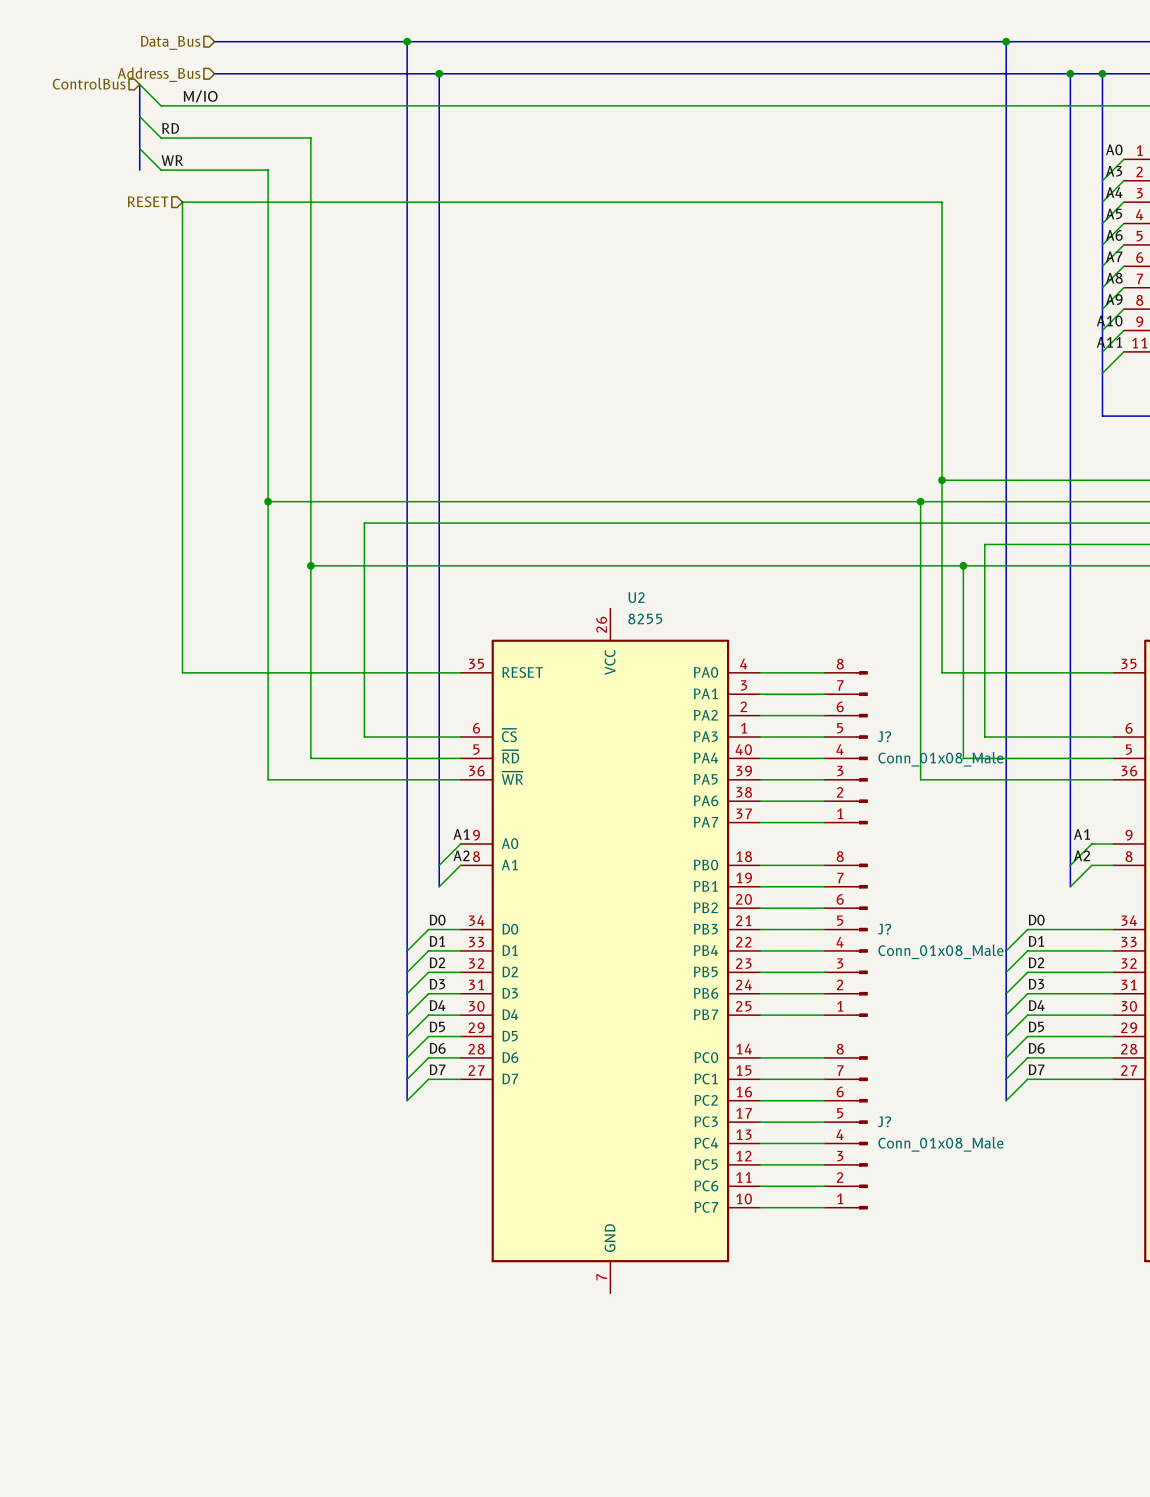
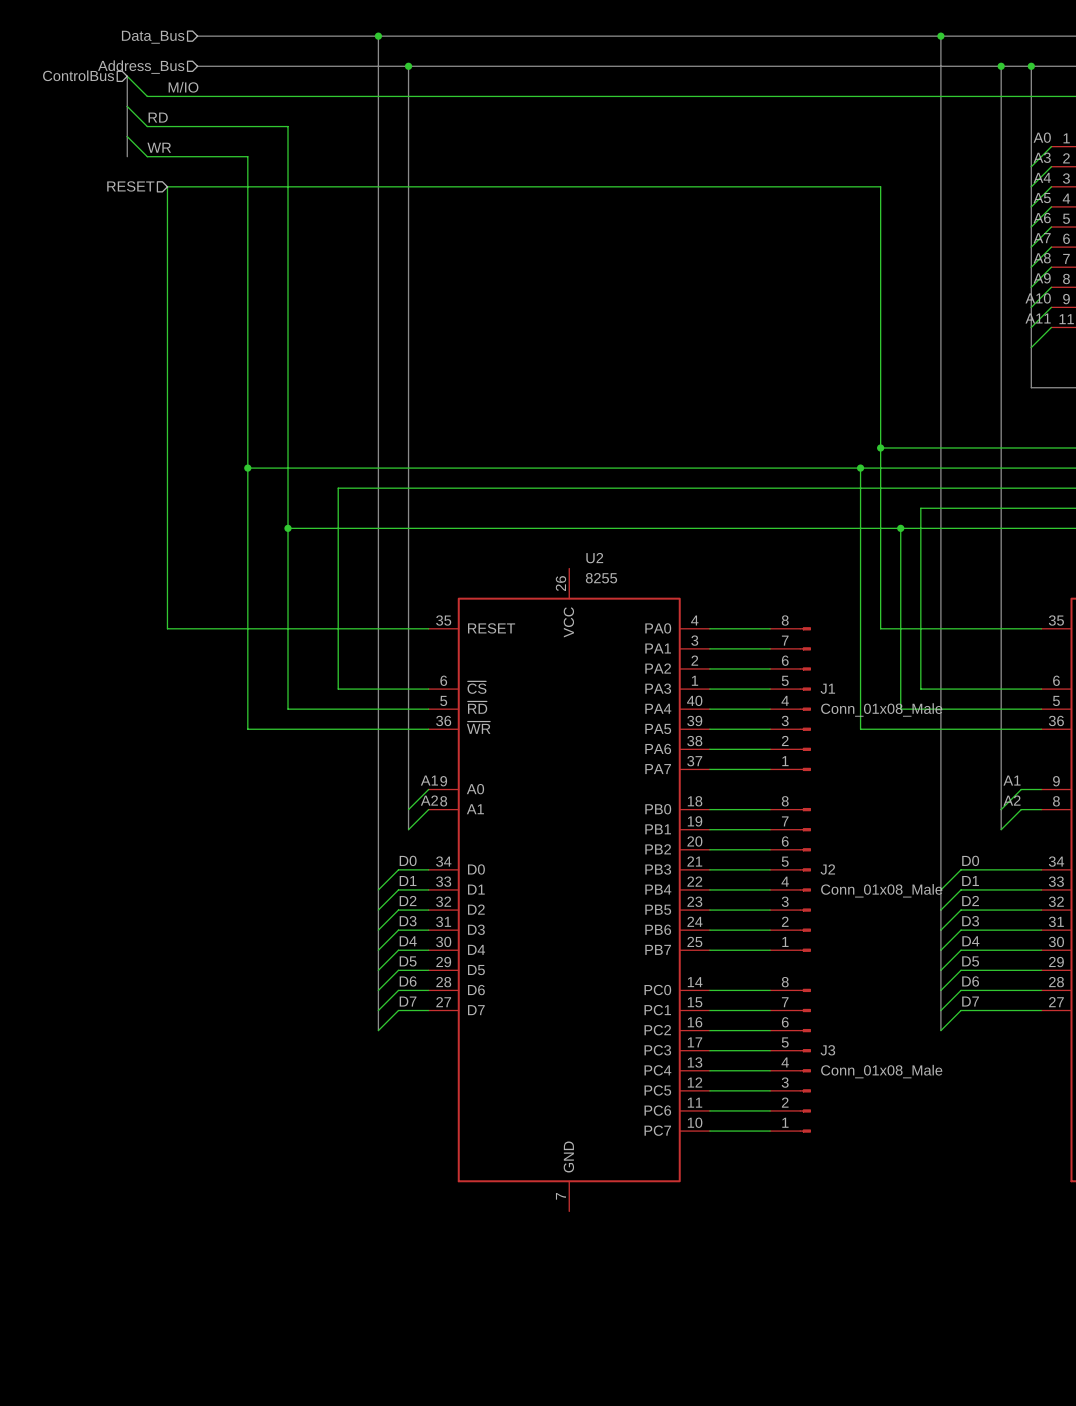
J? name: J? (884, 736) -> J1 (827, 688)
J? name: J? (884, 929) -> J2 (827, 869)
J? name: J? (884, 1121) -> J3 (827, 1050)

